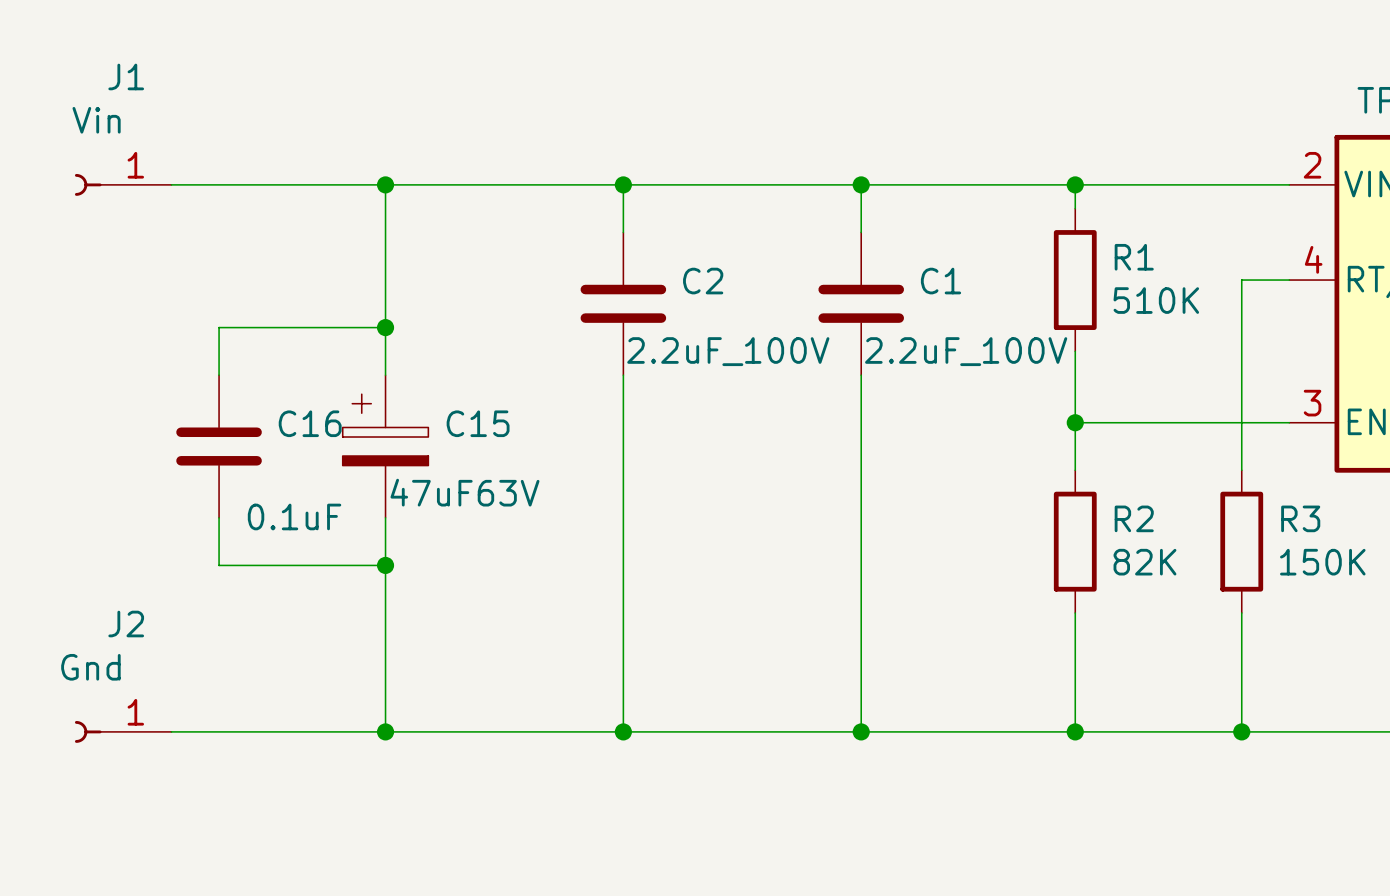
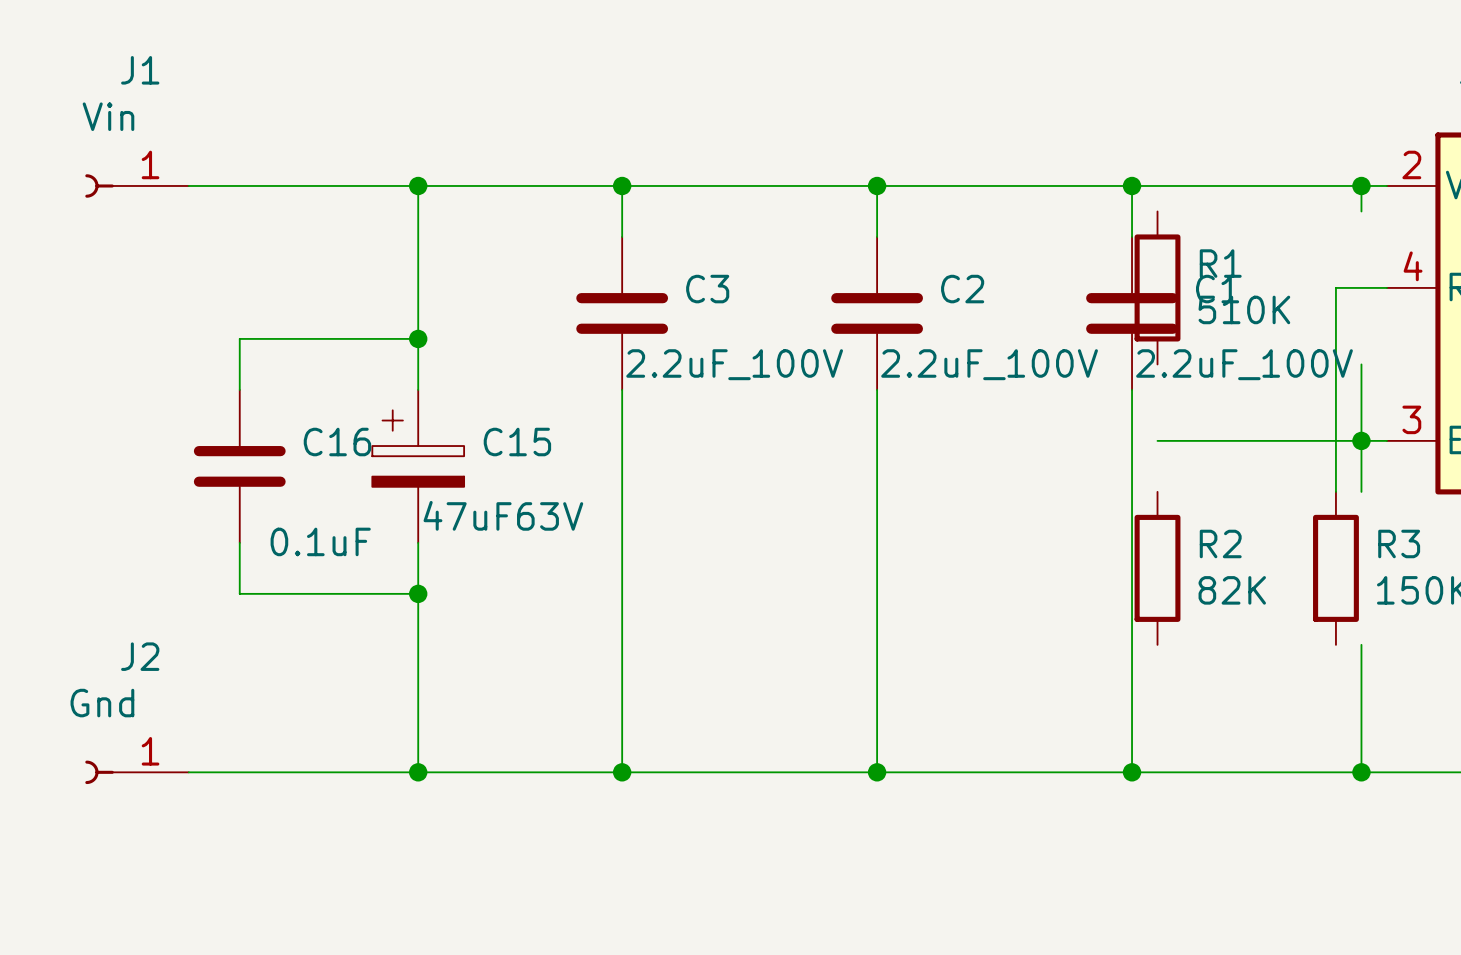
wire: none -> (622, 185) (622, 236)
wire: (623, 184) (623, 232) -> (877, 185) (877, 236)
junction position: (623, 184) -> (622, 185)
wire: (861, 184) (861, 232) -> (1132, 185) (1132, 236)
junction position: (861, 184) -> (877, 185)
wire: (1075, 184) (1075, 208) -> (1361, 185) (1361, 211)
junction position: (1075, 184) -> (1132, 185)
junction: none -> (1361, 185)
C3: none -> 2.2uF_100V (622, 313)
C2 position: (623, 303) -> (877, 313)
C1 position: (861, 303) -> (1132, 313)
wire: (1075, 351) (1075, 470) -> (1361, 364) (1361, 491)
wire: none -> (622, 389) (622, 772)
wire: (623, 375) (623, 731) -> (877, 389) (877, 772)
wire: (861, 375) (861, 731) -> (1132, 389) (1132, 772)
junction: (1075, 422) -> none
junction: none -> (1361, 440)
wire: (1075, 613) (1075, 731) -> (1361, 644) (1361, 772)
wire: (1241, 613) (1241, 731) -> none
junction position: (623, 731) -> (622, 772)
junction position: (861, 731) -> (877, 772)
junction position: (1075, 731) -> (1132, 772)
junction position: (1241, 731) -> (1361, 772)

